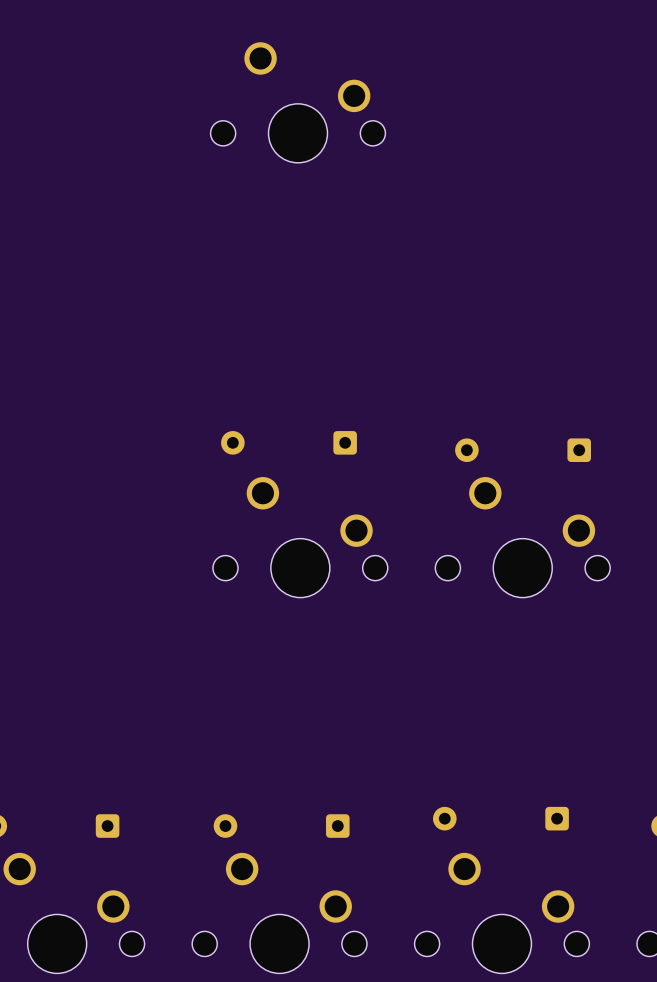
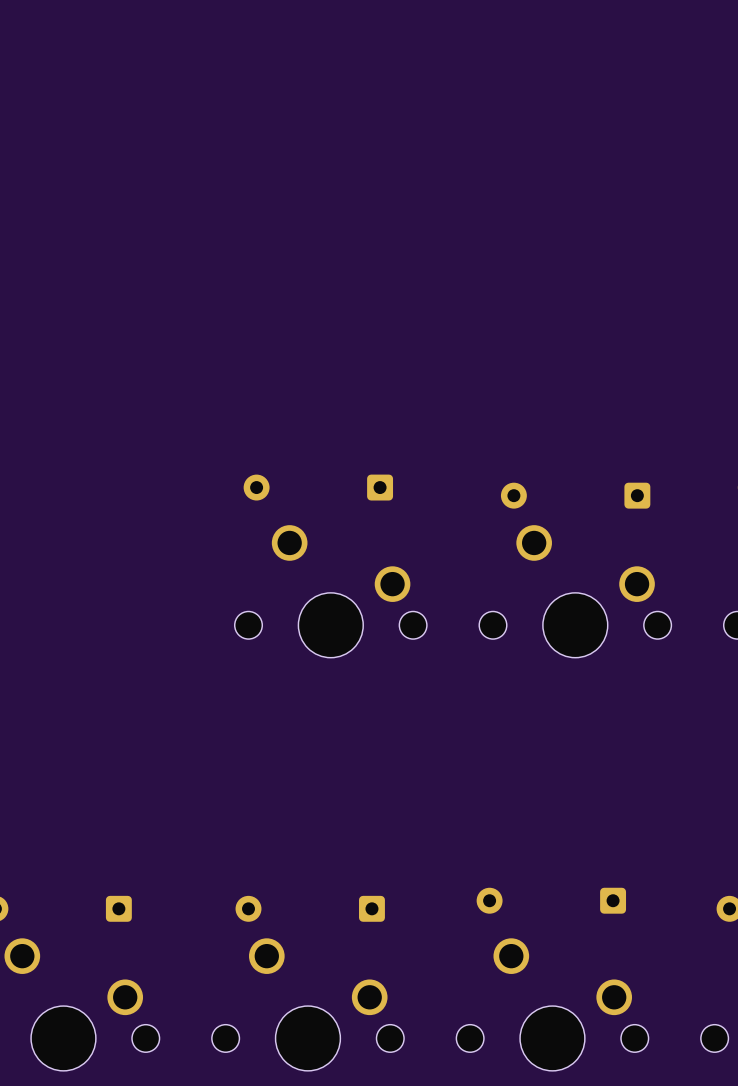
part: (298, 102) -> none

